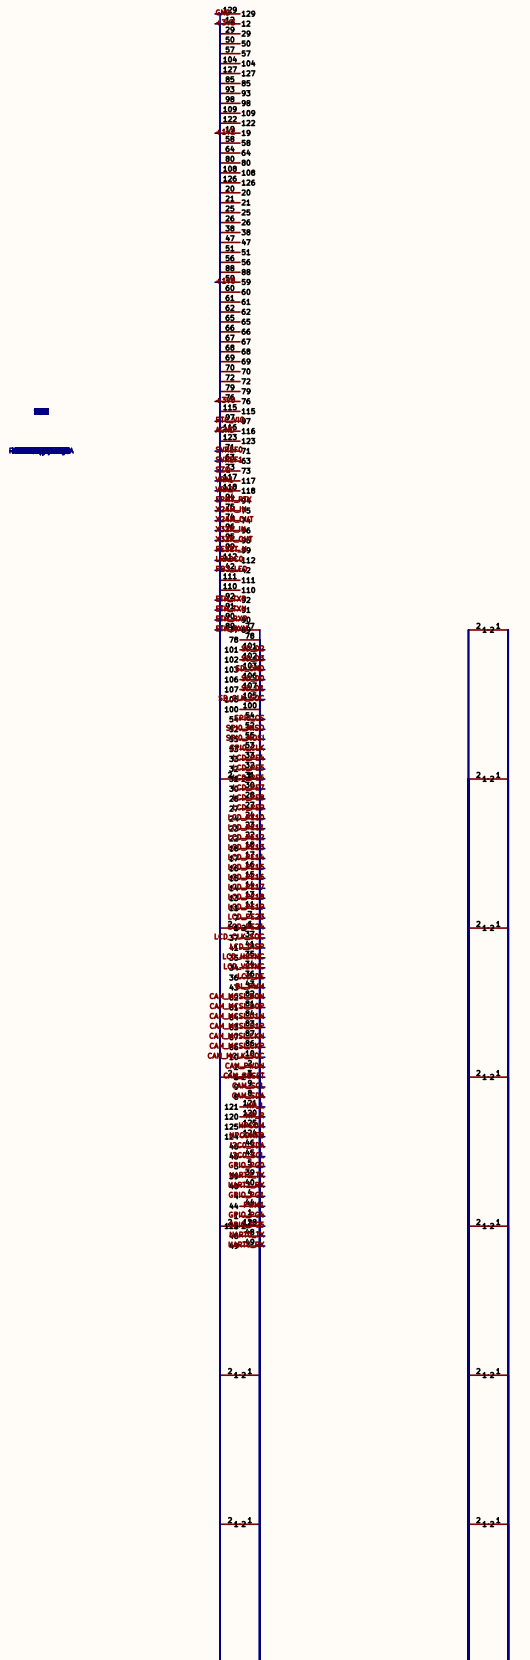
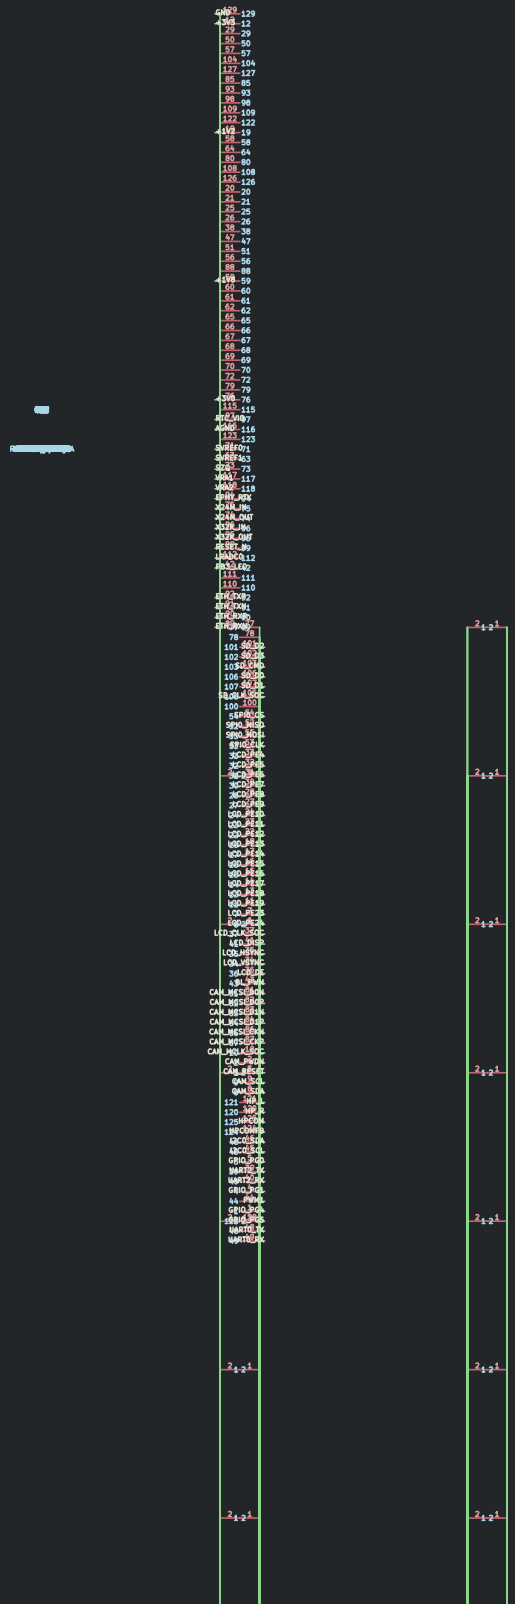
part symbol: [220, 13, 260, 1247] -> [220, 13, 260, 1241]

